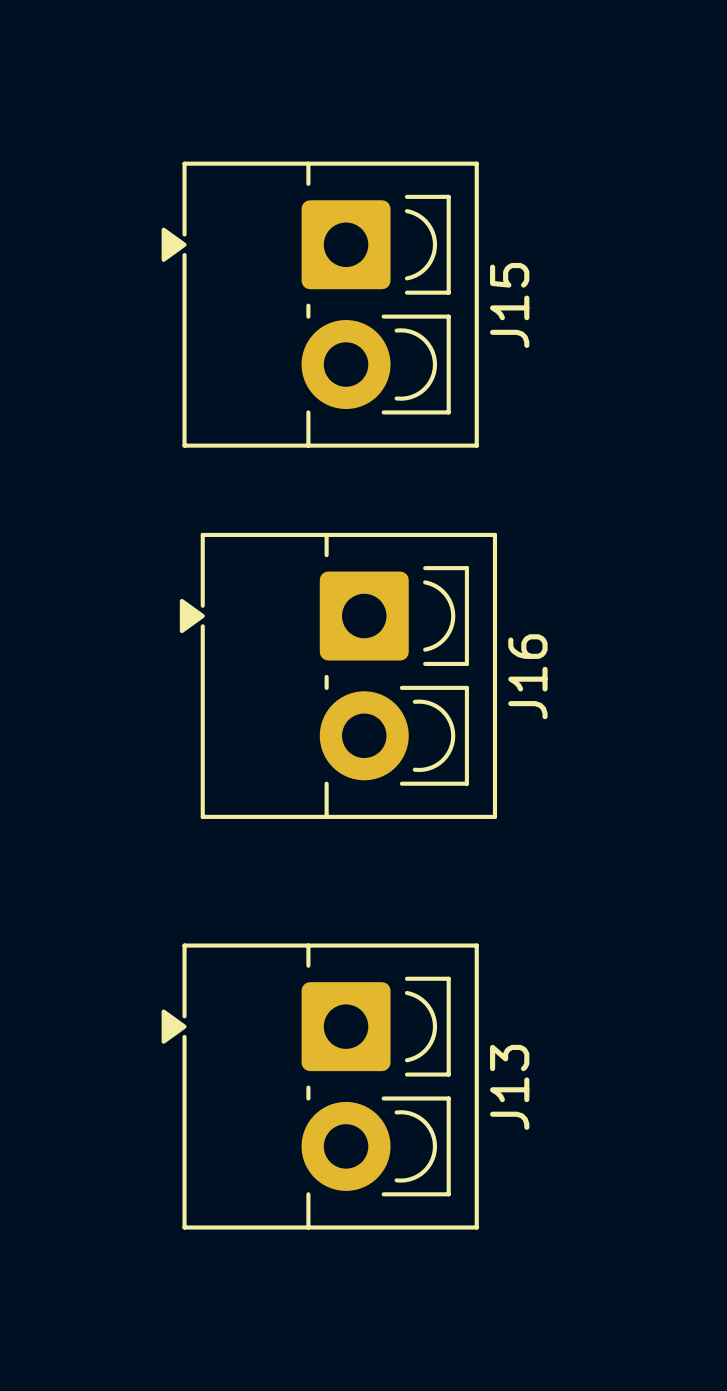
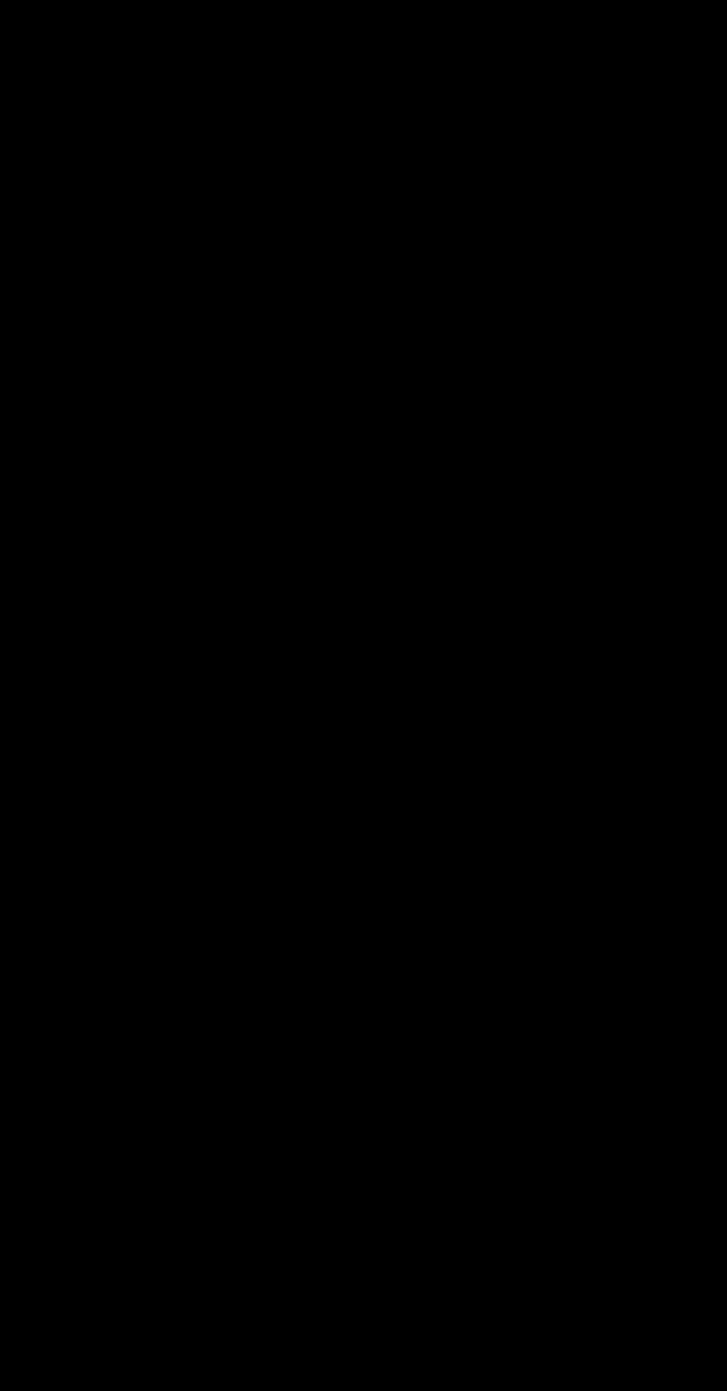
J15: (320, 304) -> none
J16: (338, 675) -> none
J13: (320, 1086) -> none

